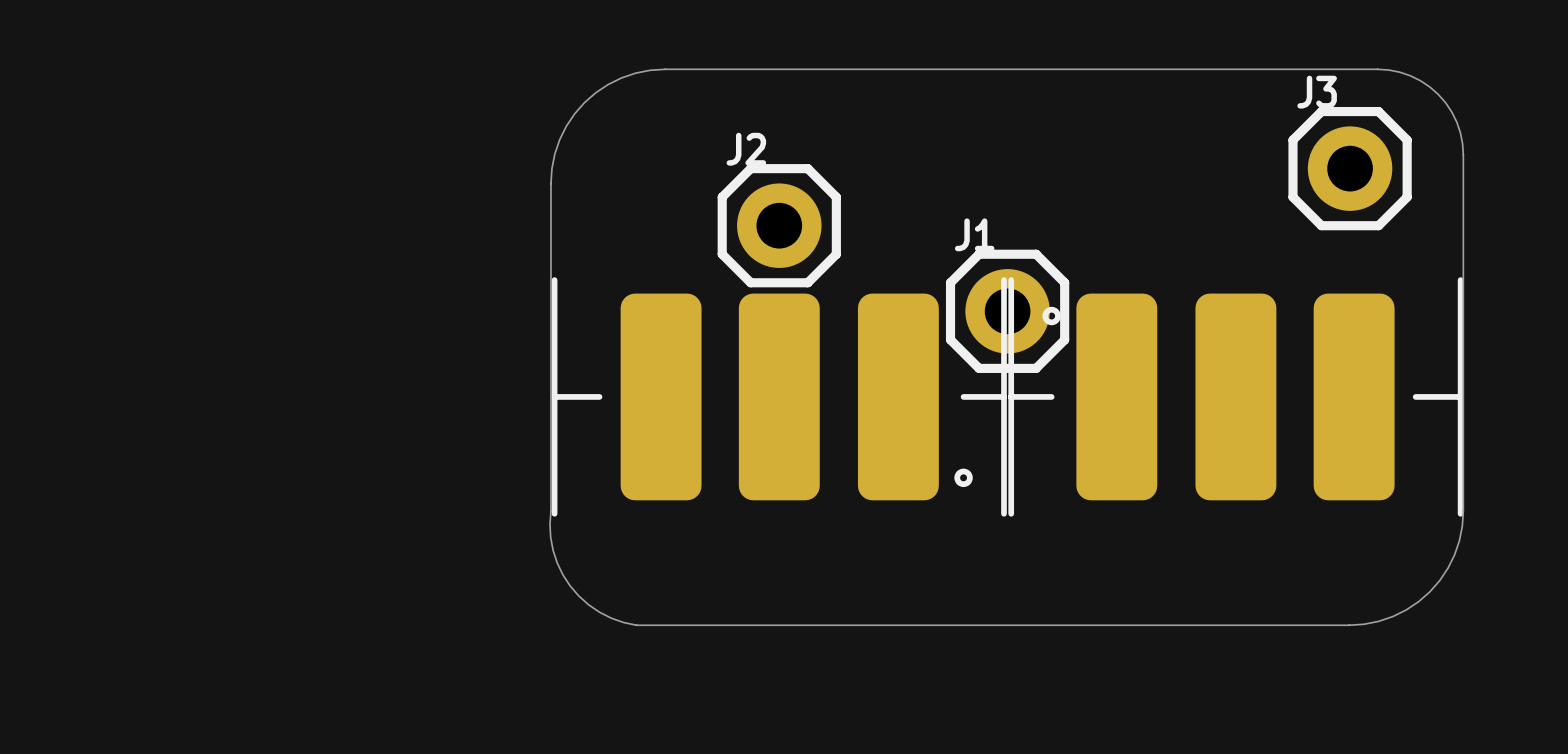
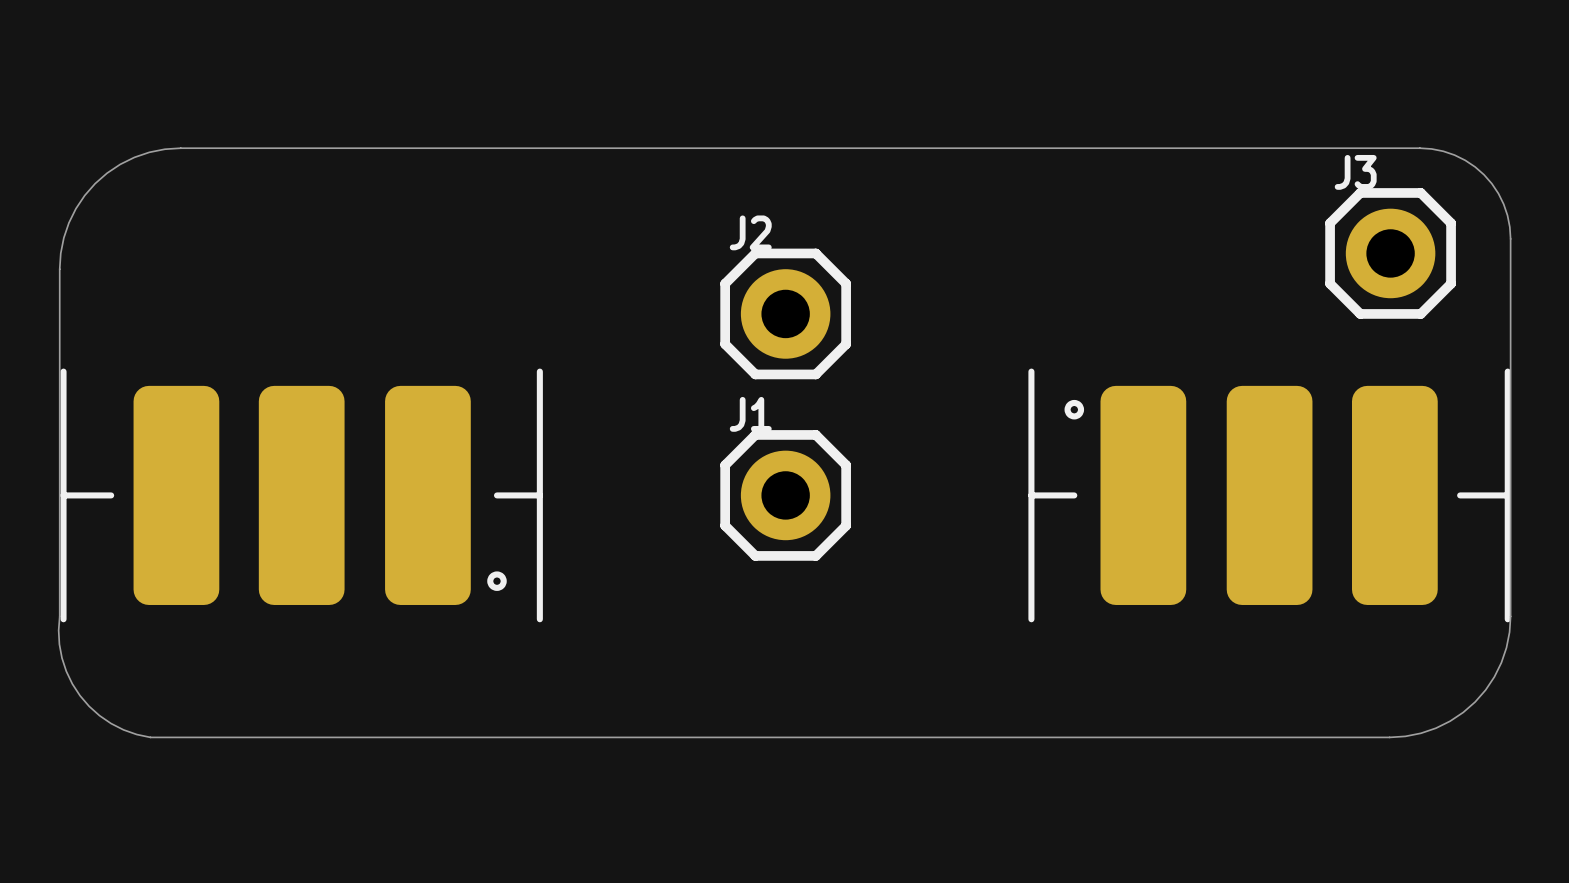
board edge: (665, 69) (635, 73) (621, 77) (595, 92) (584, 102) (574, 113) (559, 139) (554, 153) (550, 183) (549, 524) (553, 550) (557, 562) (570, 585) (588, 604) (611, 618) (636, 625) -> (664, 148) (180, 148) (149, 152) (134, 157) (107, 173) (84, 195) (68, 222) (63, 237) (59, 269) (59, 644) (66, 671) (72, 683) (80, 695) (99, 715) (123, 729) (150, 737) (634, 737)
J1 position: (1007, 311) -> (785, 495)
part position: (779, 396) -> (301, 495)

